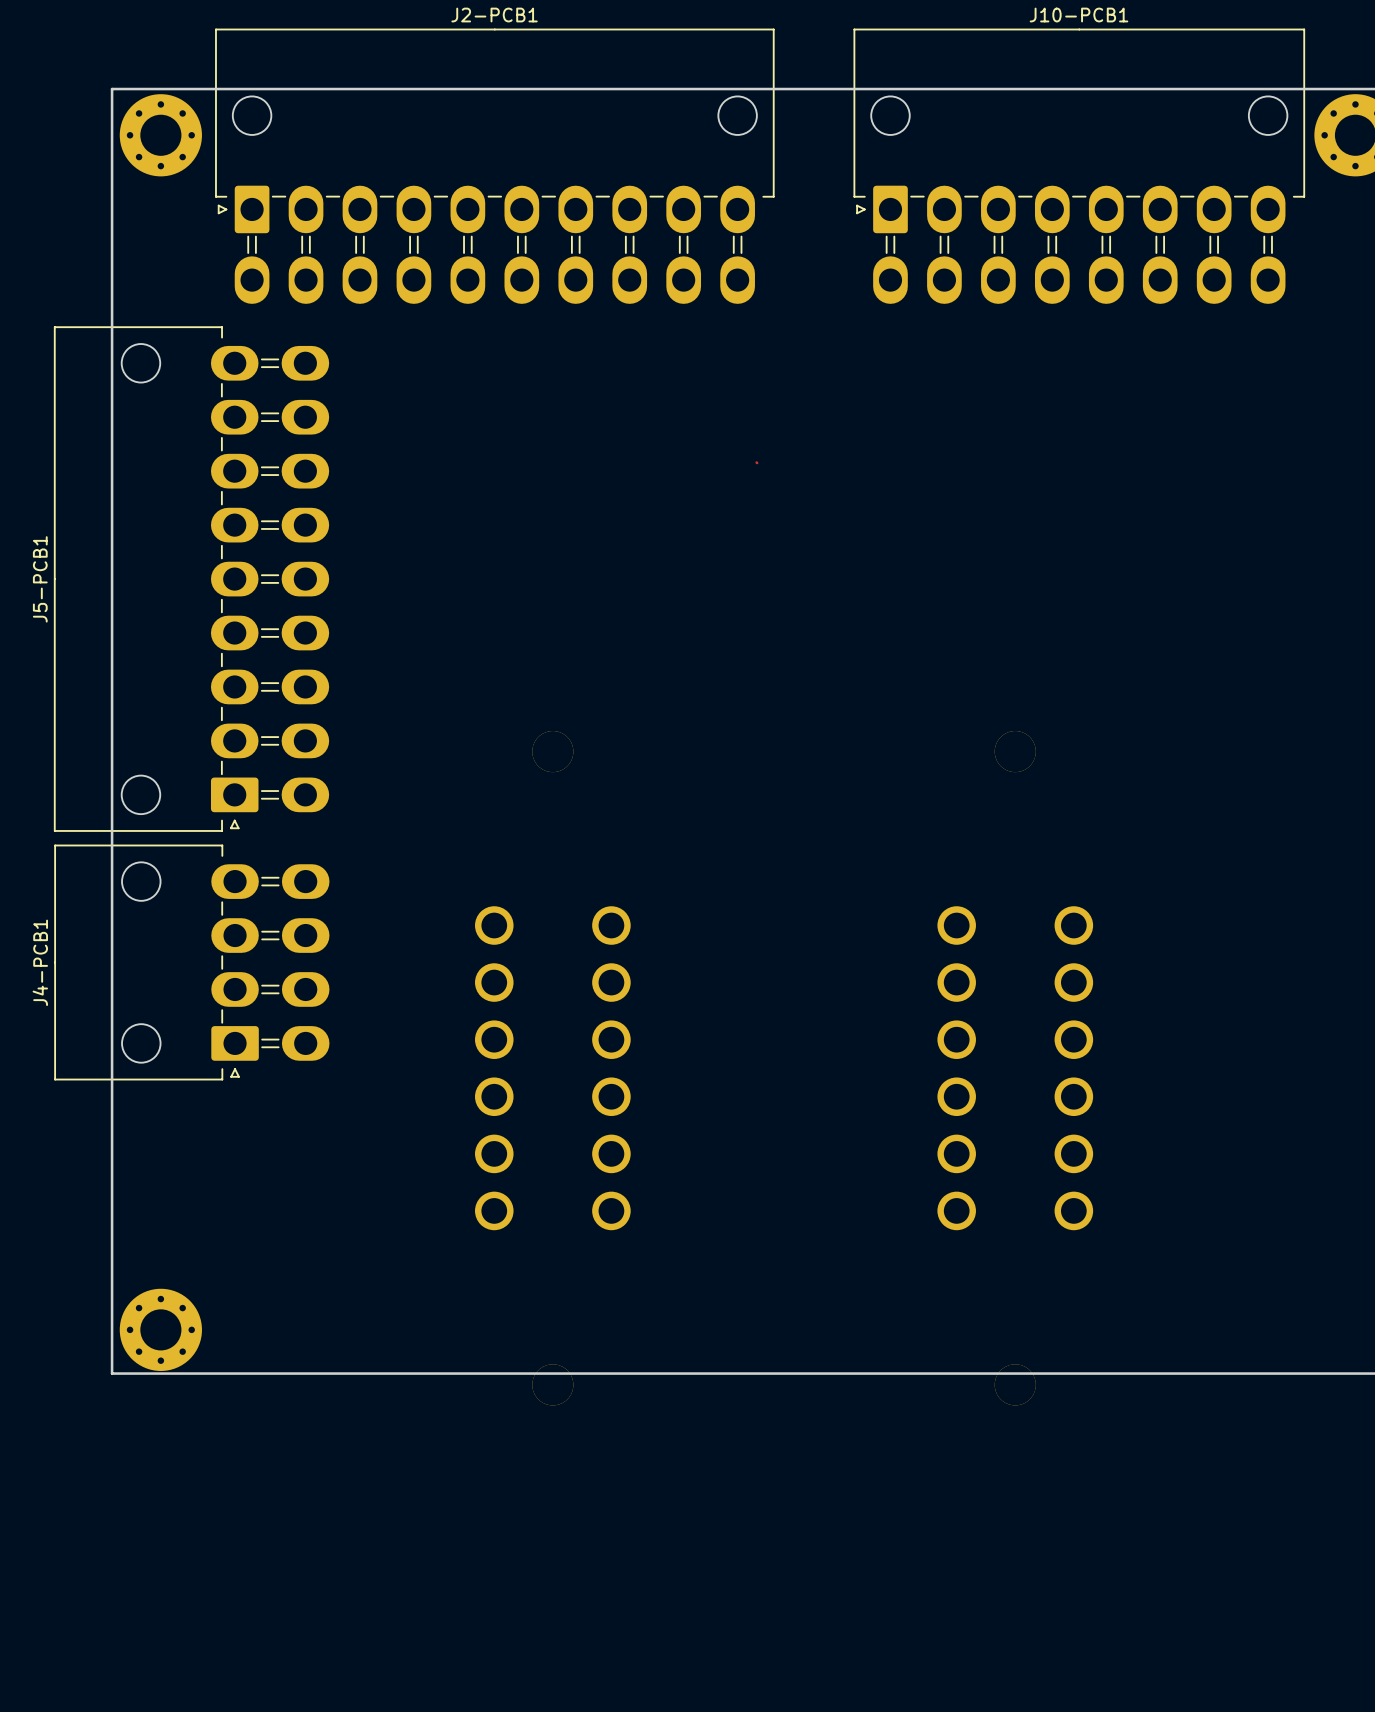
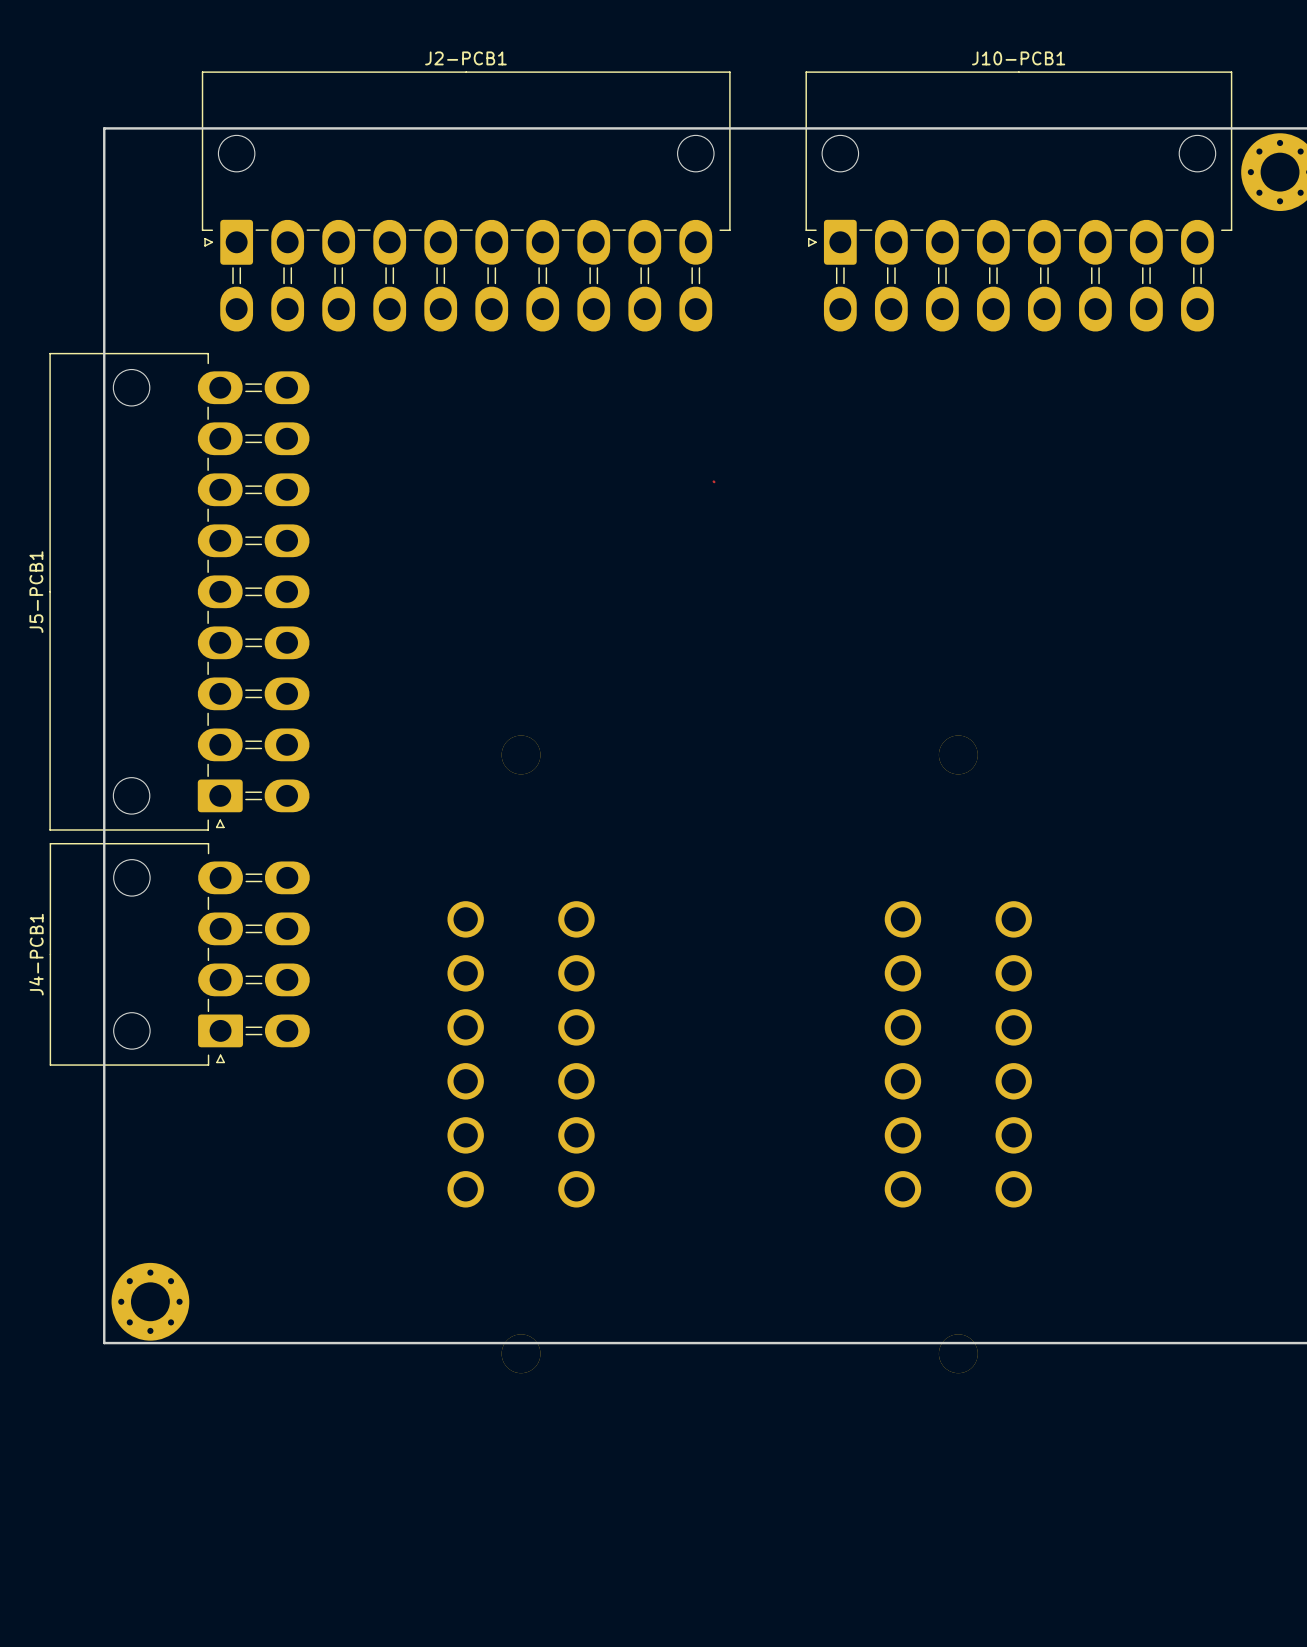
part: (160, 135) -> none

